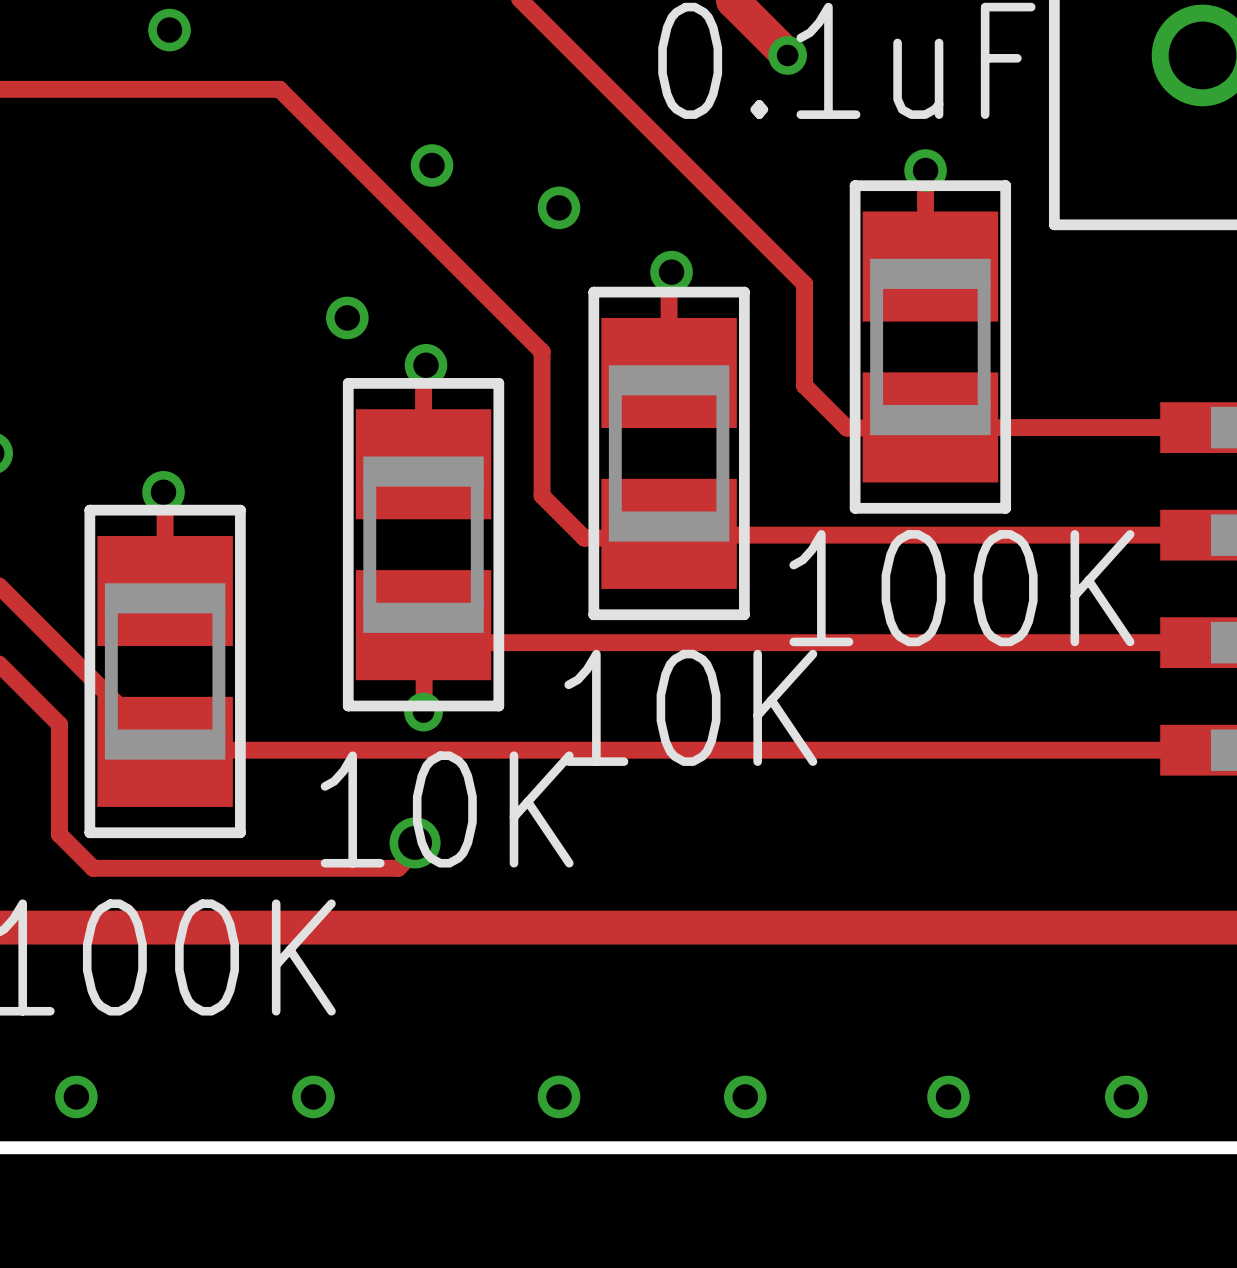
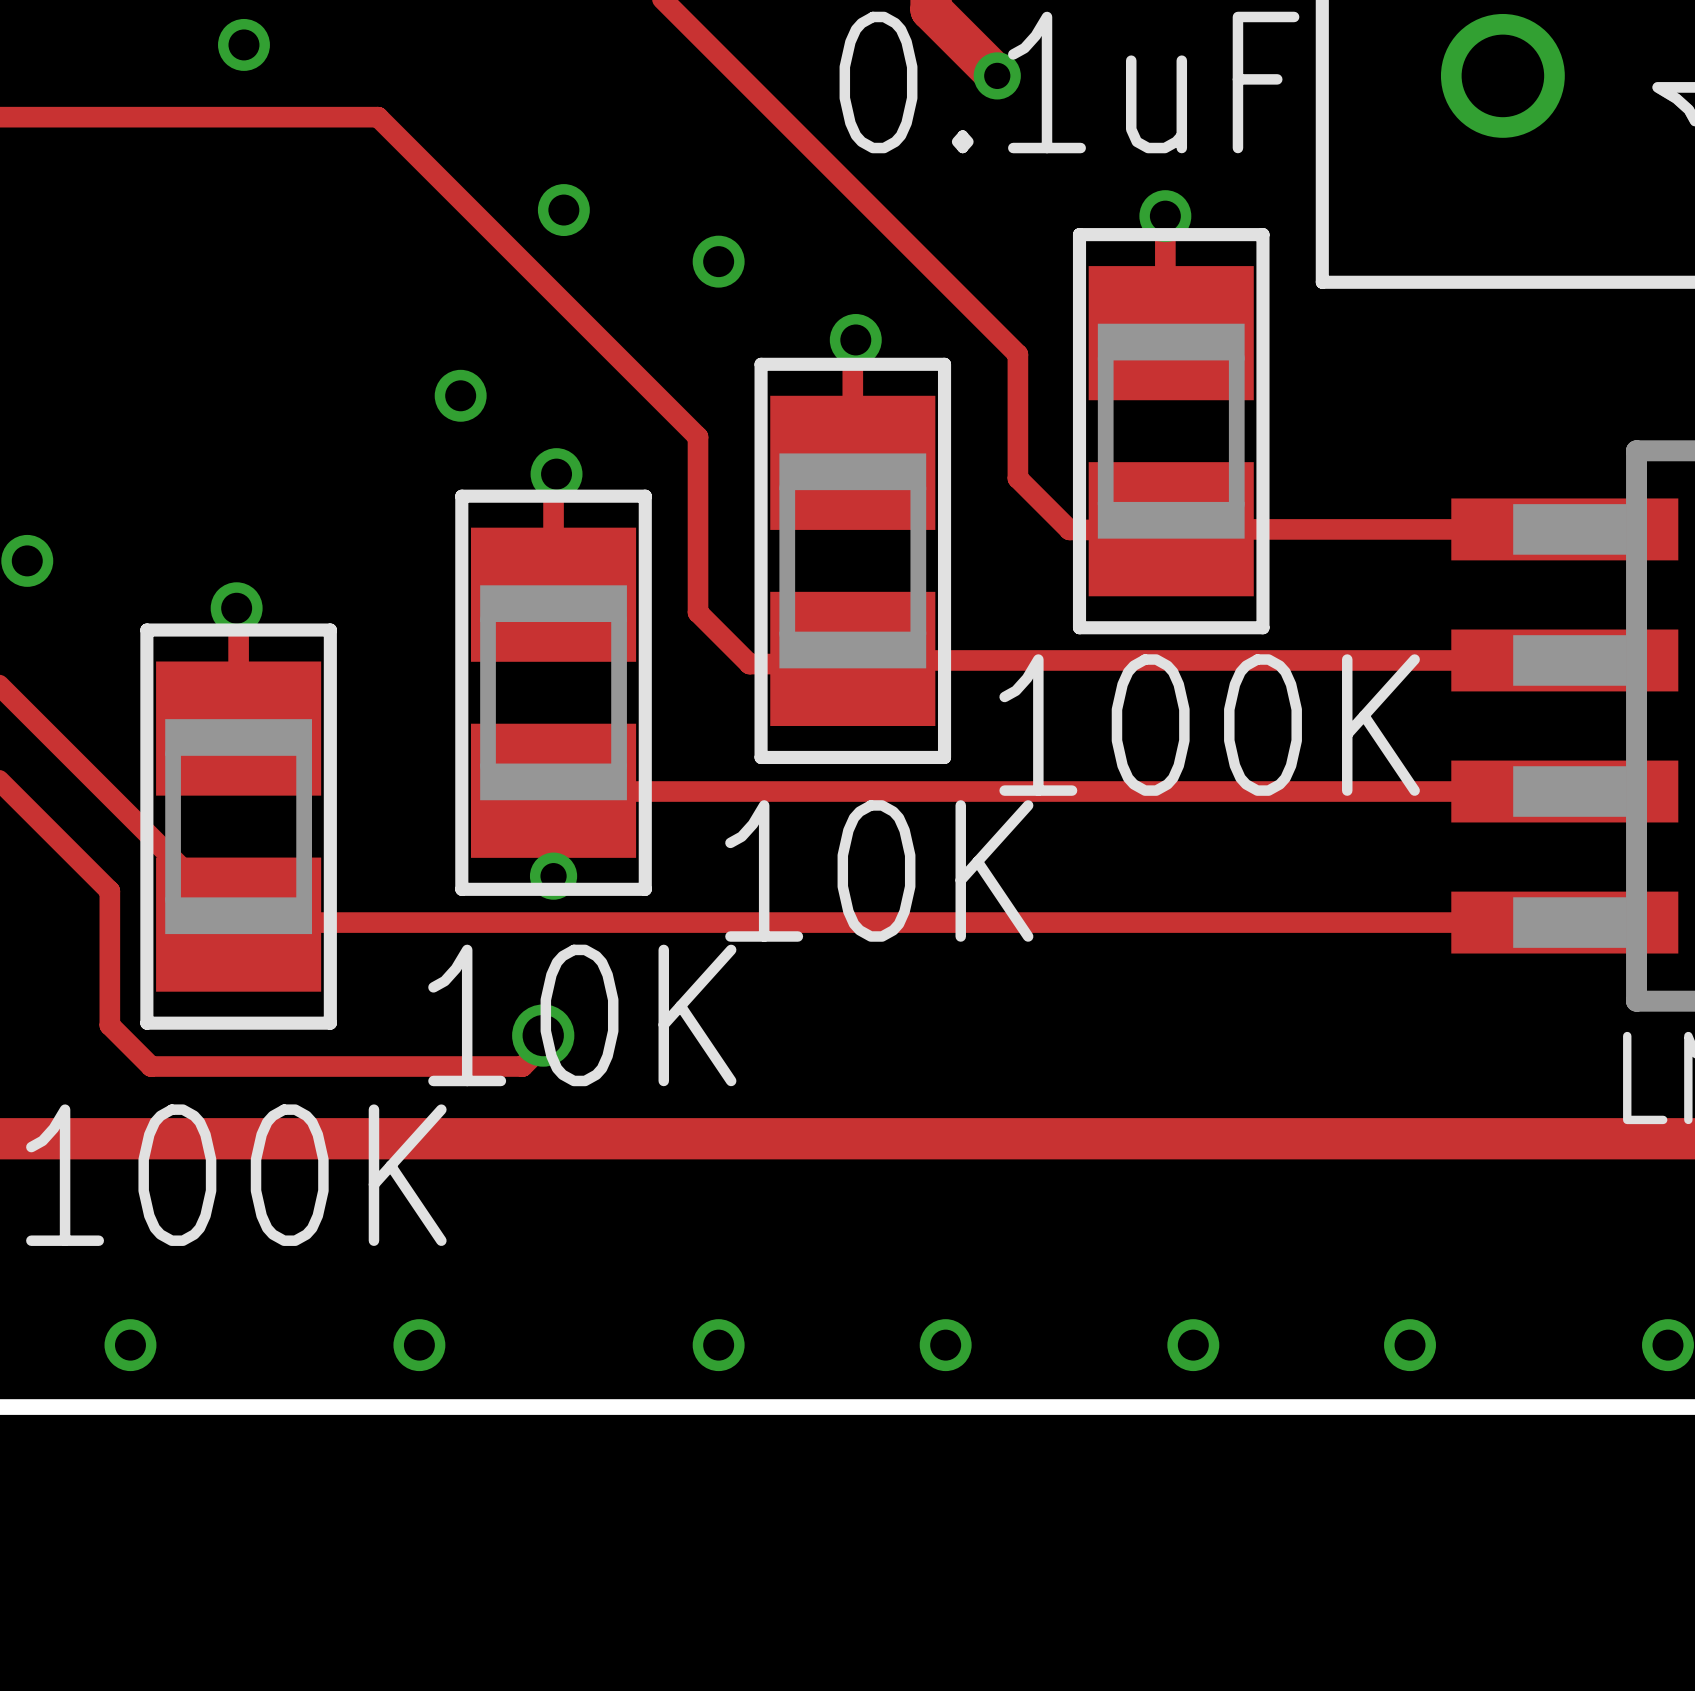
via position: (425, 365) -> (556, 474)
part position: (423, 544) -> (553, 692)

